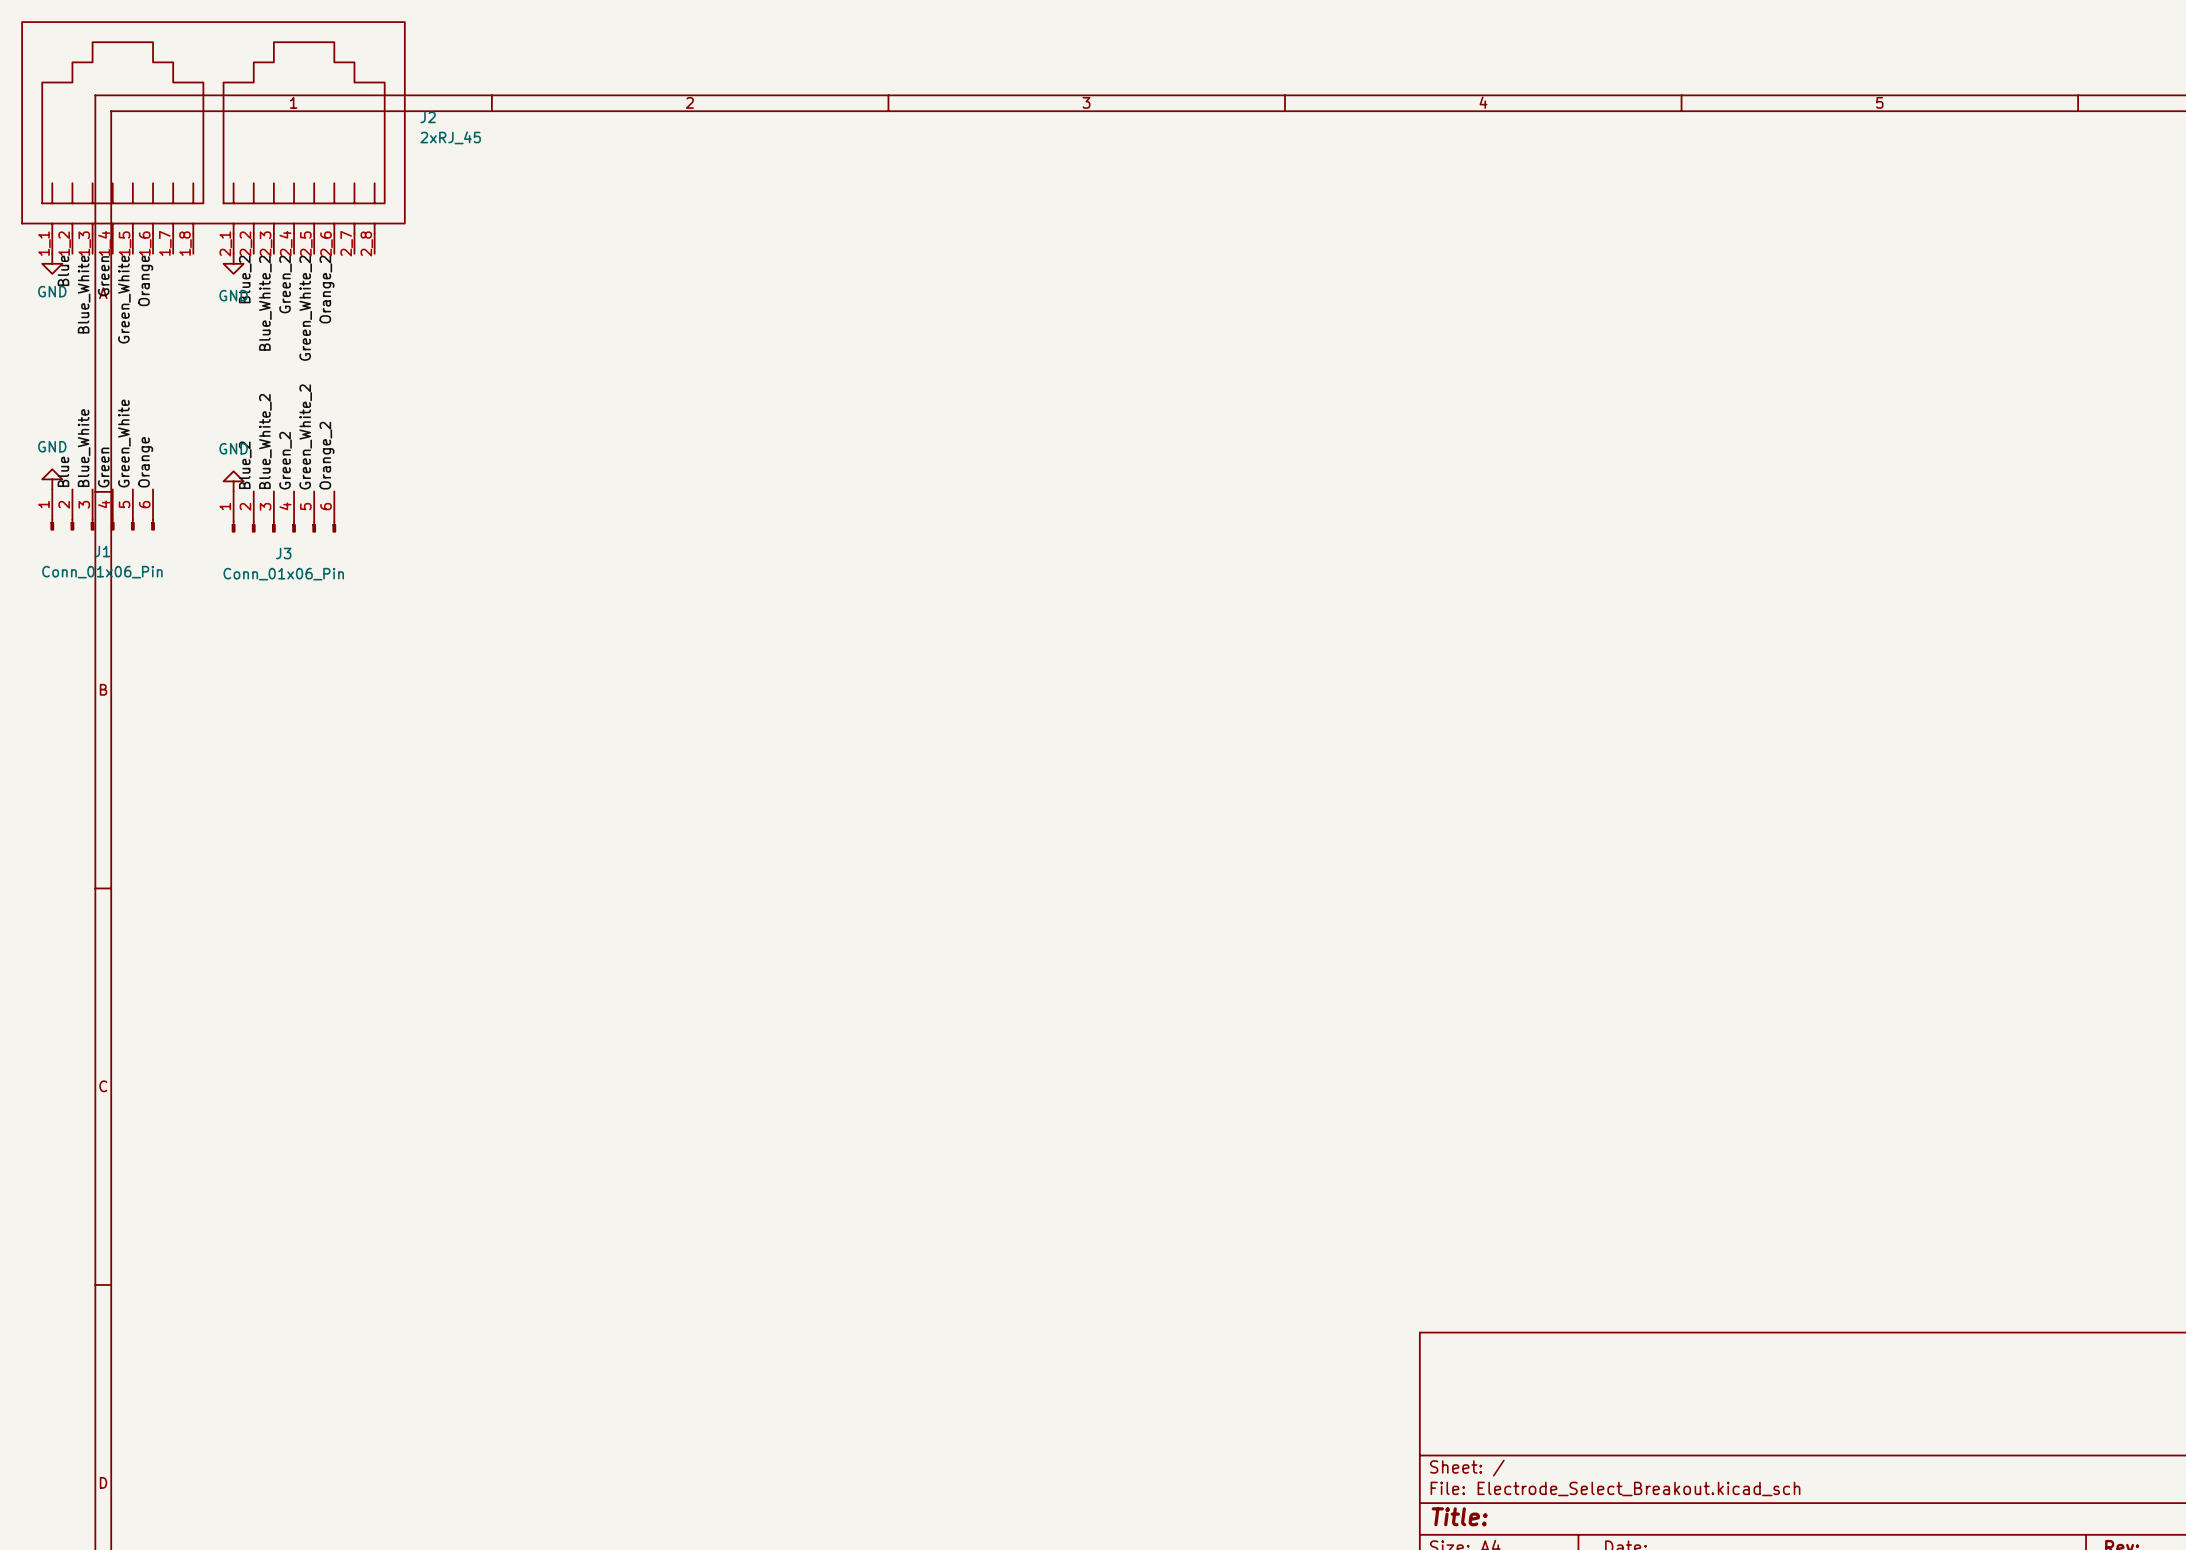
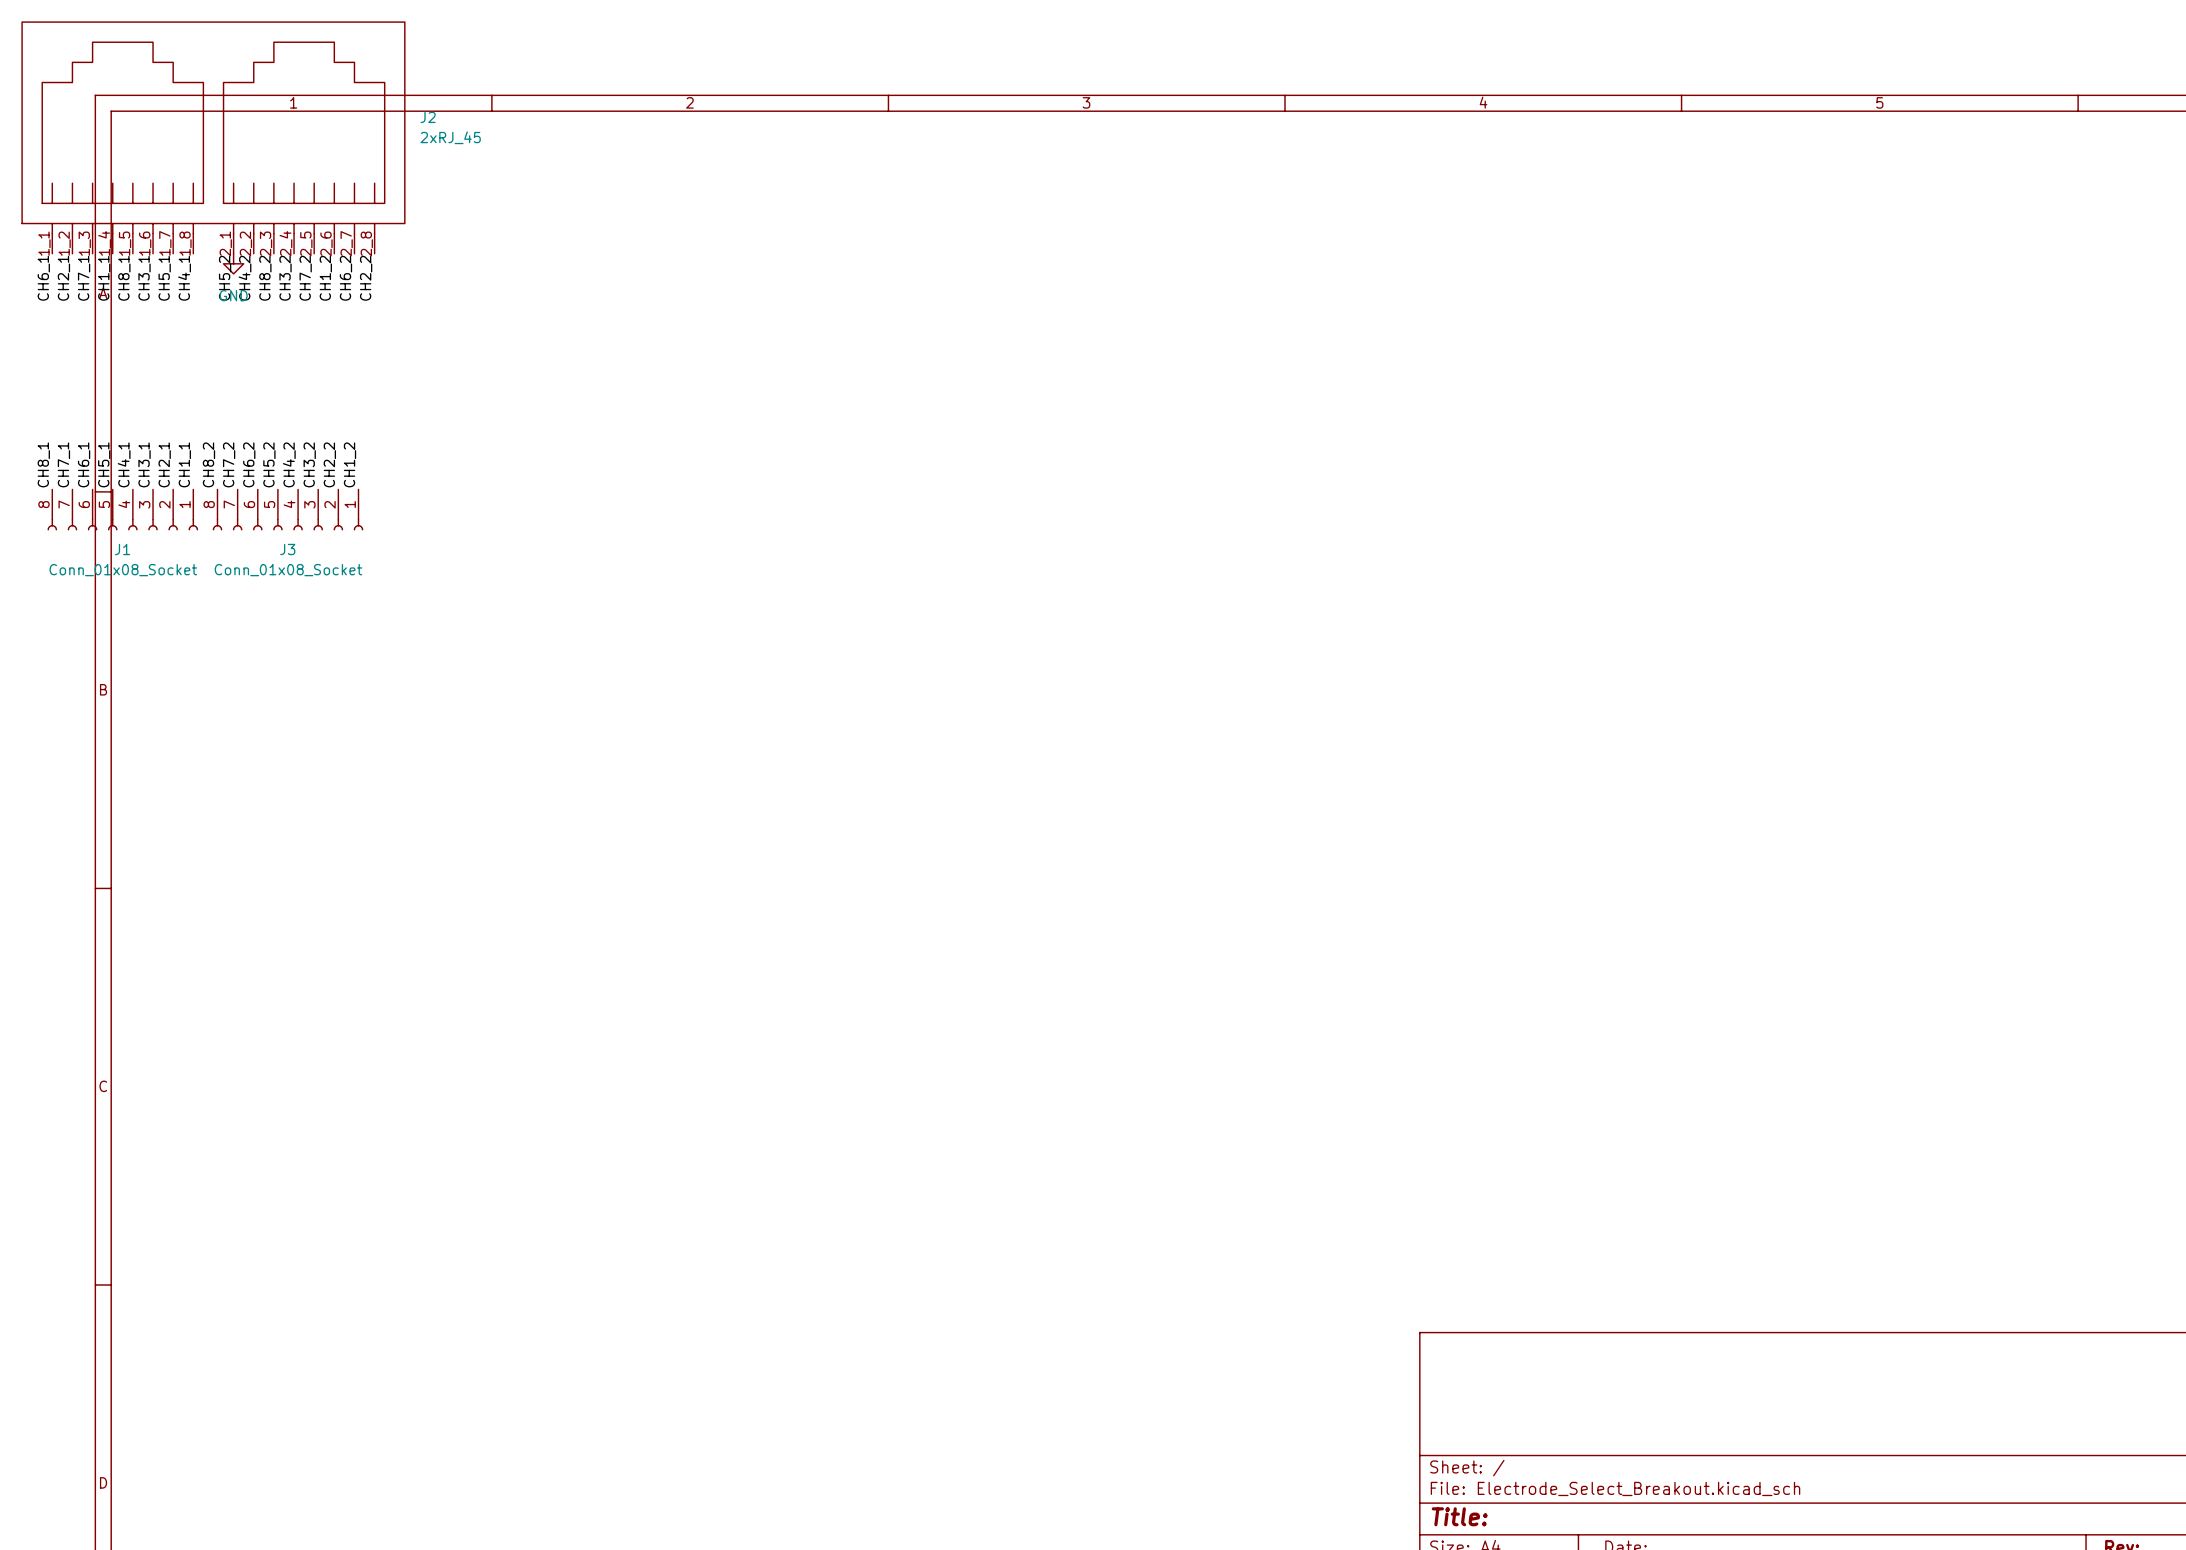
power symbol: GND (52, 263) -> none
label: Blue (63, 270) -> CH2_1 (63, 278)
label: Green (103, 276) -> CH1_1 (104, 278)
label: none -> CH6_1 (43, 278)
label: none -> CH5_1 (164, 278)
label: none -> CH4_1 (184, 278)
label: none -> CH5_2 (225, 278)
label: none -> CH6_2 (345, 278)
label: none -> CH2_2 (366, 278)
label: Blue_2 (245, 279) -> CH4_2 (244, 278)
label: Orange (145, 280) -> CH3_1 (144, 278)
label: Green_2 (285, 284) -> CH3_2 (285, 278)
label: Orange_2 (327, 289) -> CH1_2 (325, 278)
label: Blue_White (84, 294) -> CH7_1 (84, 278)
label: Green_White (124, 299) -> CH8_1 (124, 278)
label: Blue_White_2 (265, 303) -> CH8_2 (265, 278)
label: Green_White_2 (305, 308) -> CH7_2 (305, 278)
label: Green_White_2 (305, 436) -> CH3_2 (309, 464)
label: Blue_White_2 (265, 441) -> CH5_2 (269, 464)
label: Green_White (124, 443) -> CH4_1 (124, 464)
label: Blue_White (84, 448) -> CH6_1 (84, 464)
label: Orange_2 (327, 455) -> CH2_2 (329, 464)
label: Green_2 (285, 460) -> CH4_2 (289, 464)
label: Orange (145, 462) -> CH3_1 (144, 464)
label: none -> CH8_1 (43, 464)
label: none -> CH2_1 (164, 464)
label: none -> CH1_1 (184, 464)
label: none -> CH8_2 (208, 464)
label: none -> CH7_2 (229, 464)
label: none -> CH1_2 (349, 464)
label: Blue_2 (245, 465) -> CH6_2 (249, 464)
label: Green (103, 467) -> CH5_1 (104, 464)
label: Blue (63, 471) -> CH7_1 (63, 464)
power symbol: GND (52, 479) -> none
power symbol: GND (233, 481) -> none
J1 symbol: [50, 489, 155, 531] -> [47, 489, 198, 531]
J3 symbol: [231, 491, 336, 533] -> [212, 489, 364, 531]
J1 value: Conn_01x06_Pin (102, 572) -> Conn_01x08_Socket (123, 570)
J3 value: Conn_01x06_Pin (283, 574) -> Conn_01x08_Socket (288, 570)

